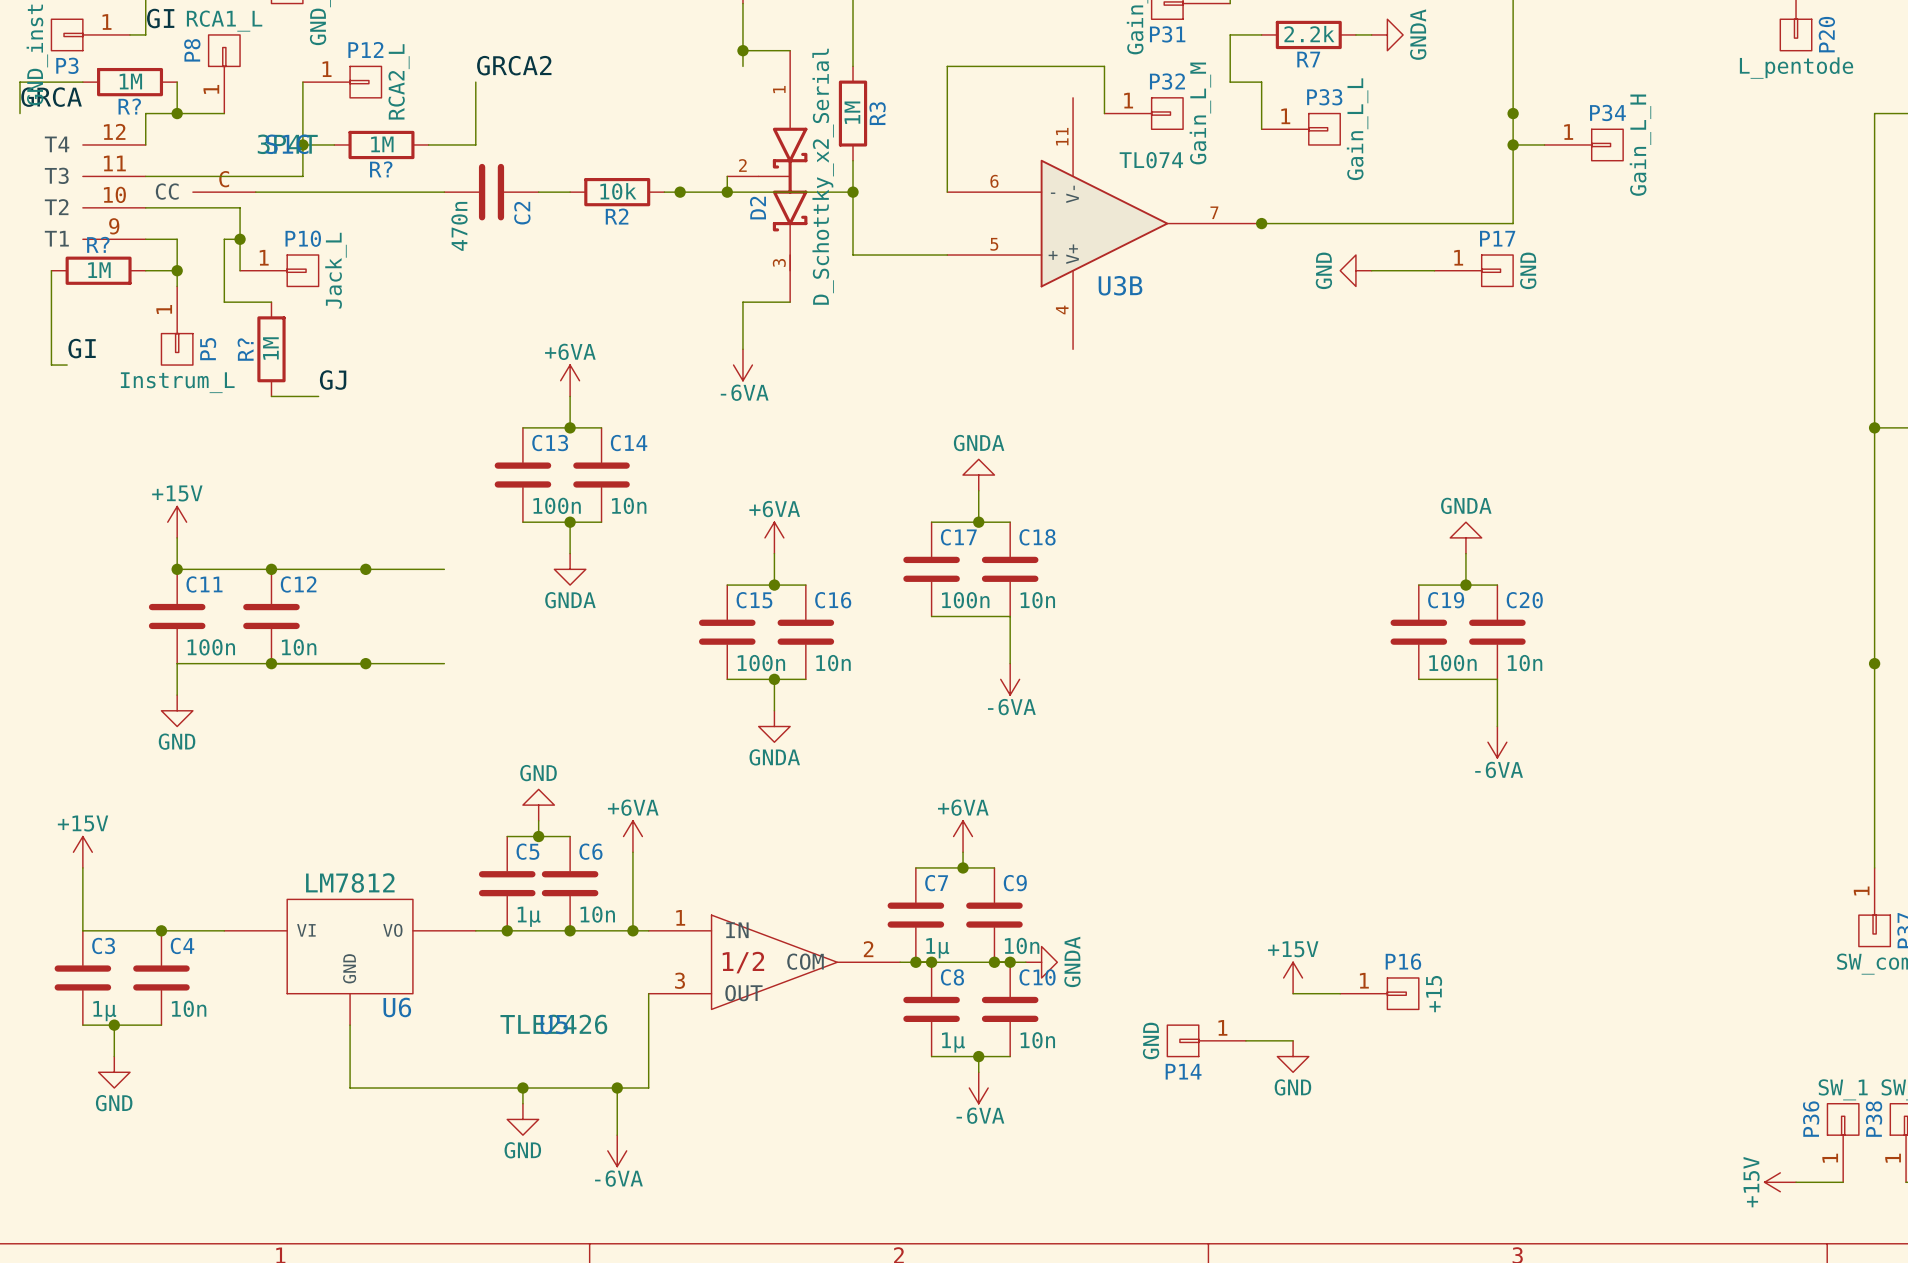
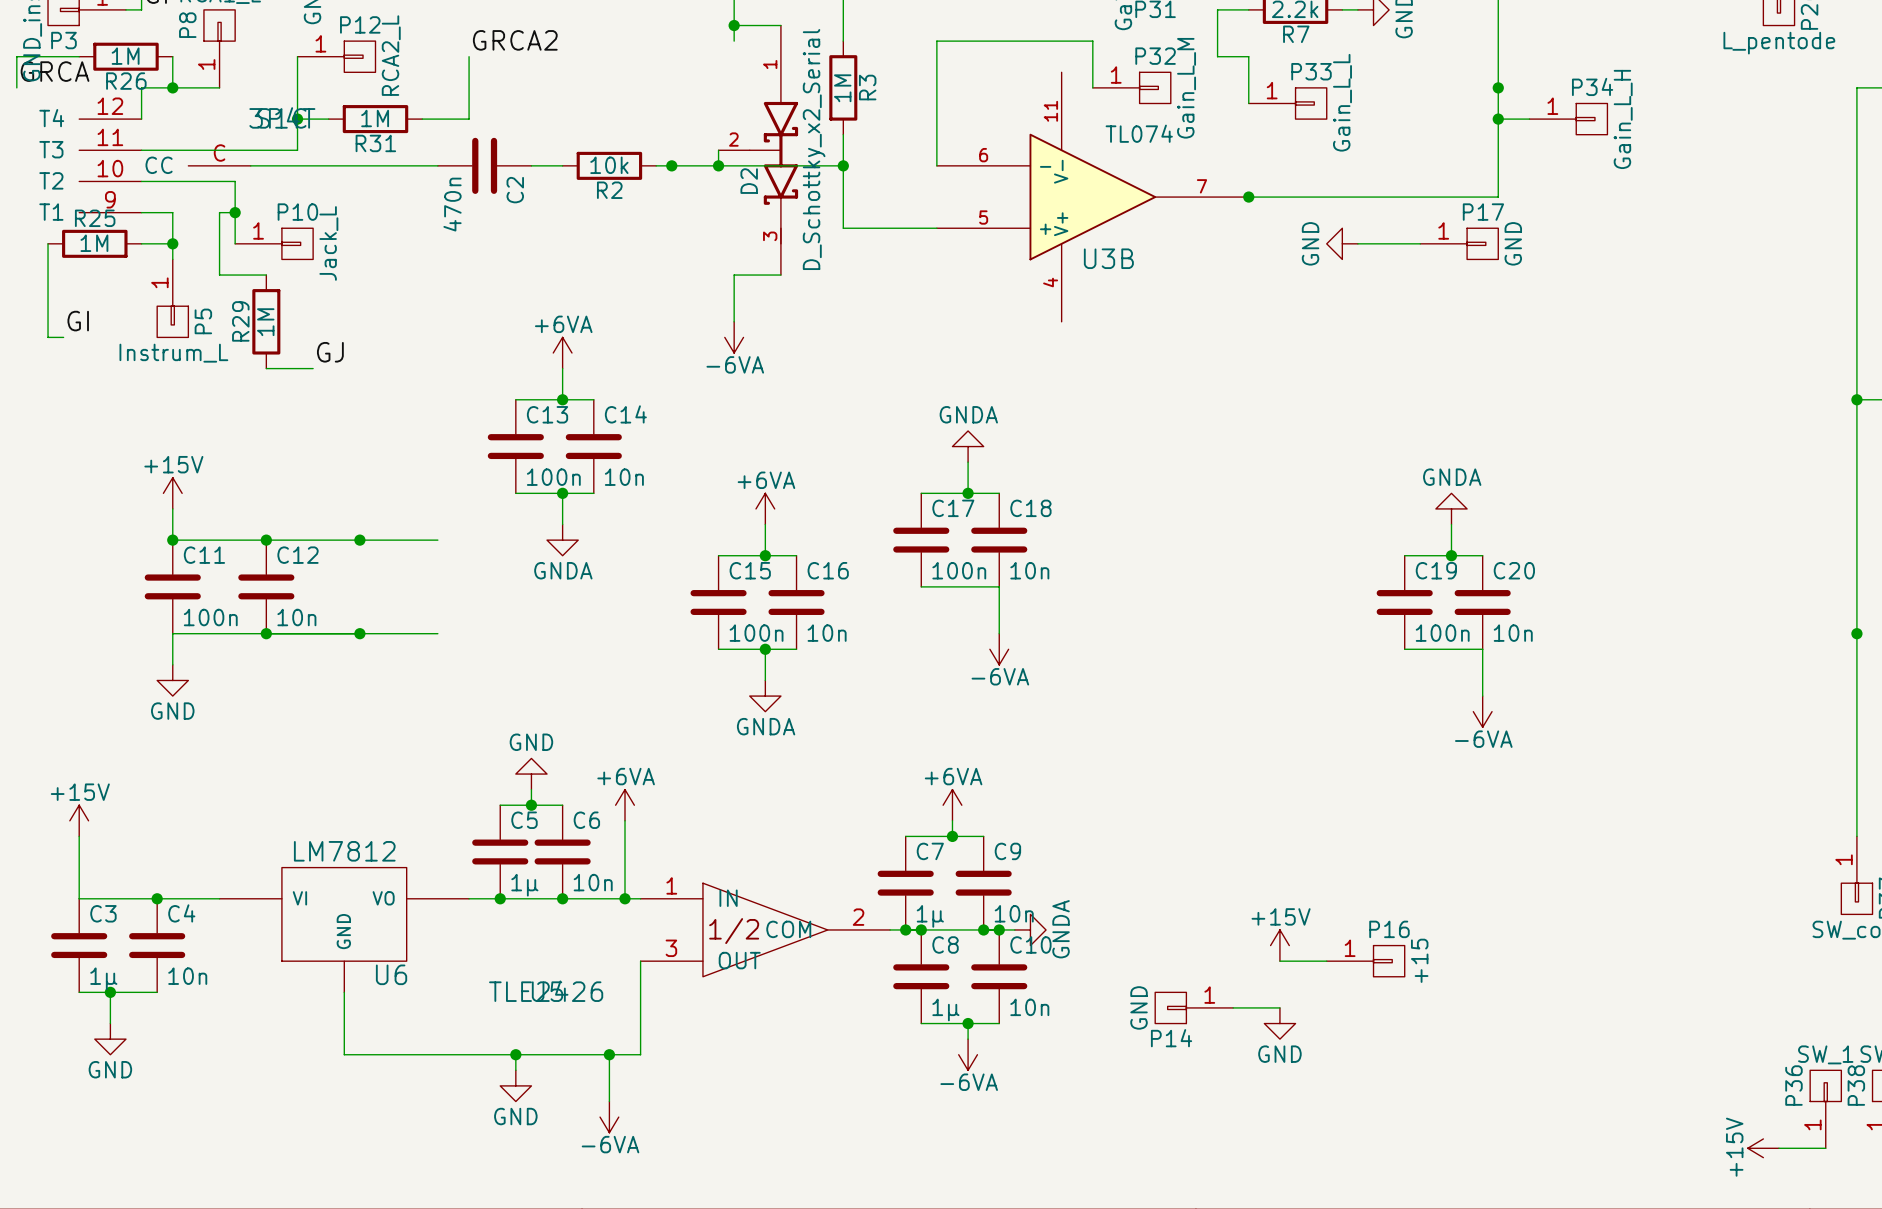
R? name: R? (129, 106) -> R26 (126, 81)
R? name: R? (381, 169) -> R31 (375, 143)
R? name: R? (98, 244) -> R25 (95, 218)
R? name: R? (245, 349) -> R29 (240, 321)

